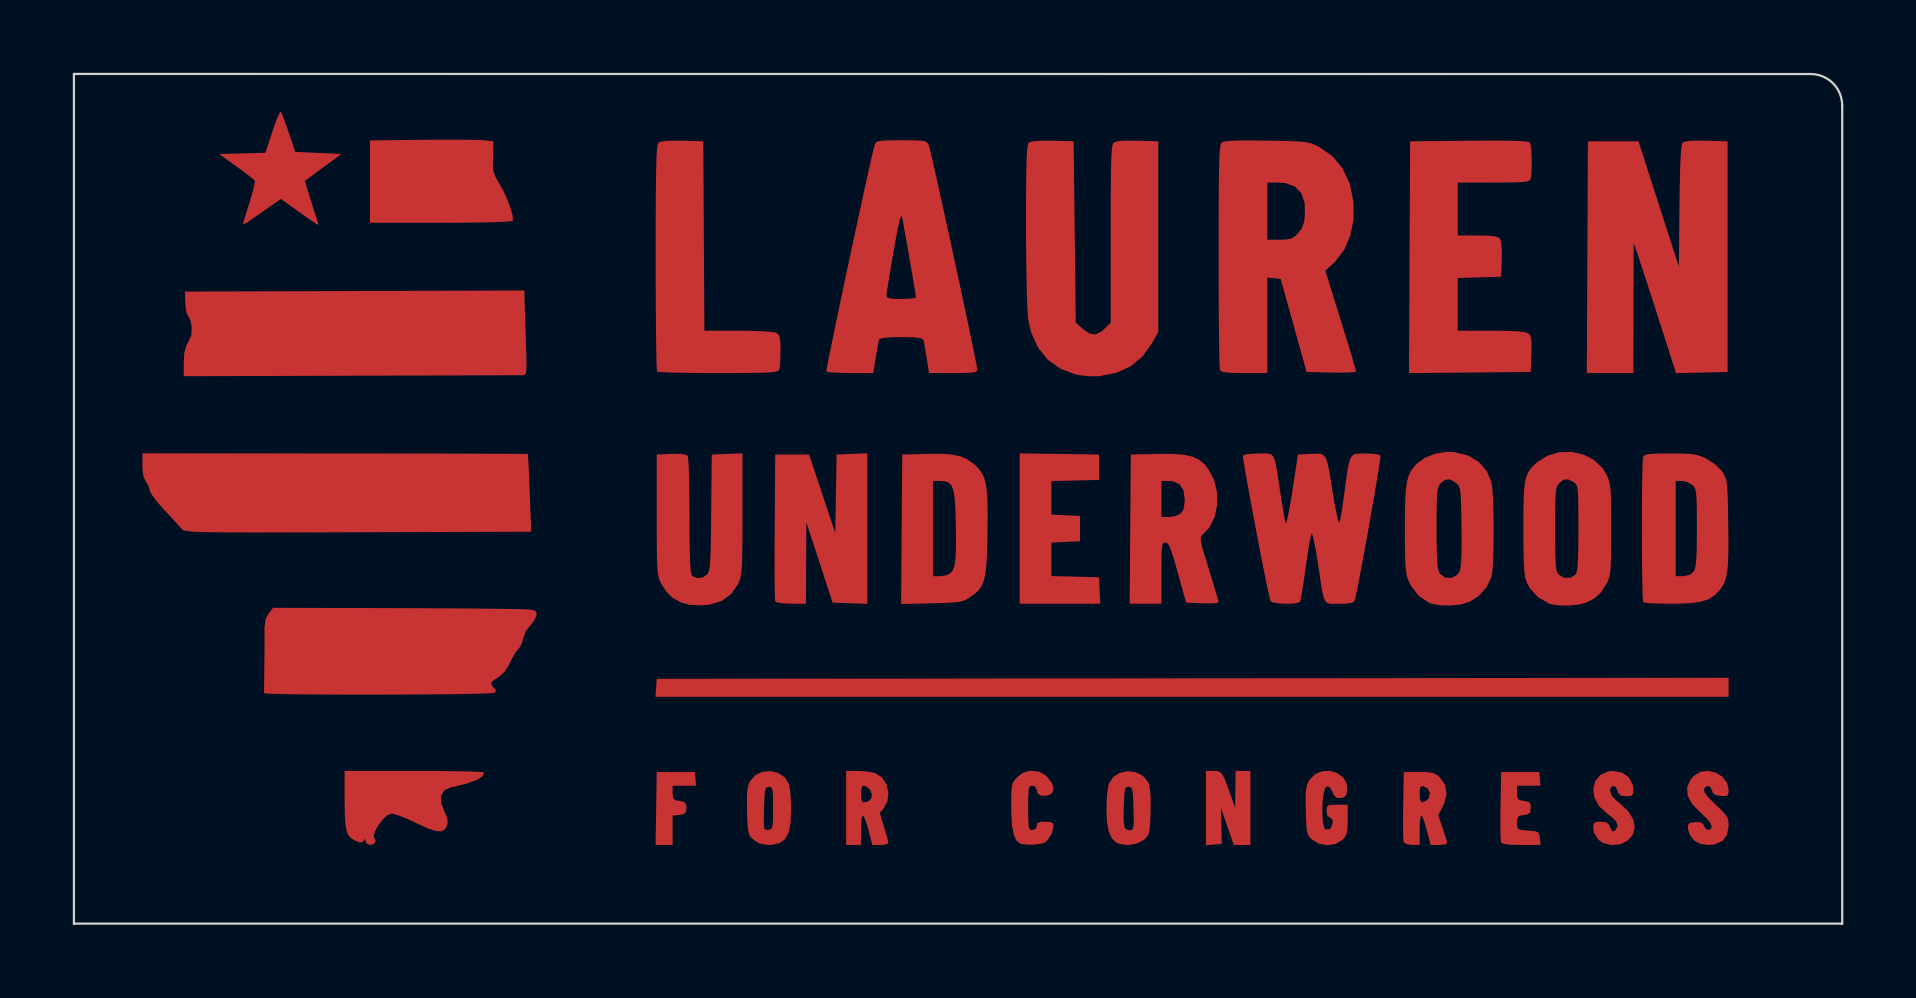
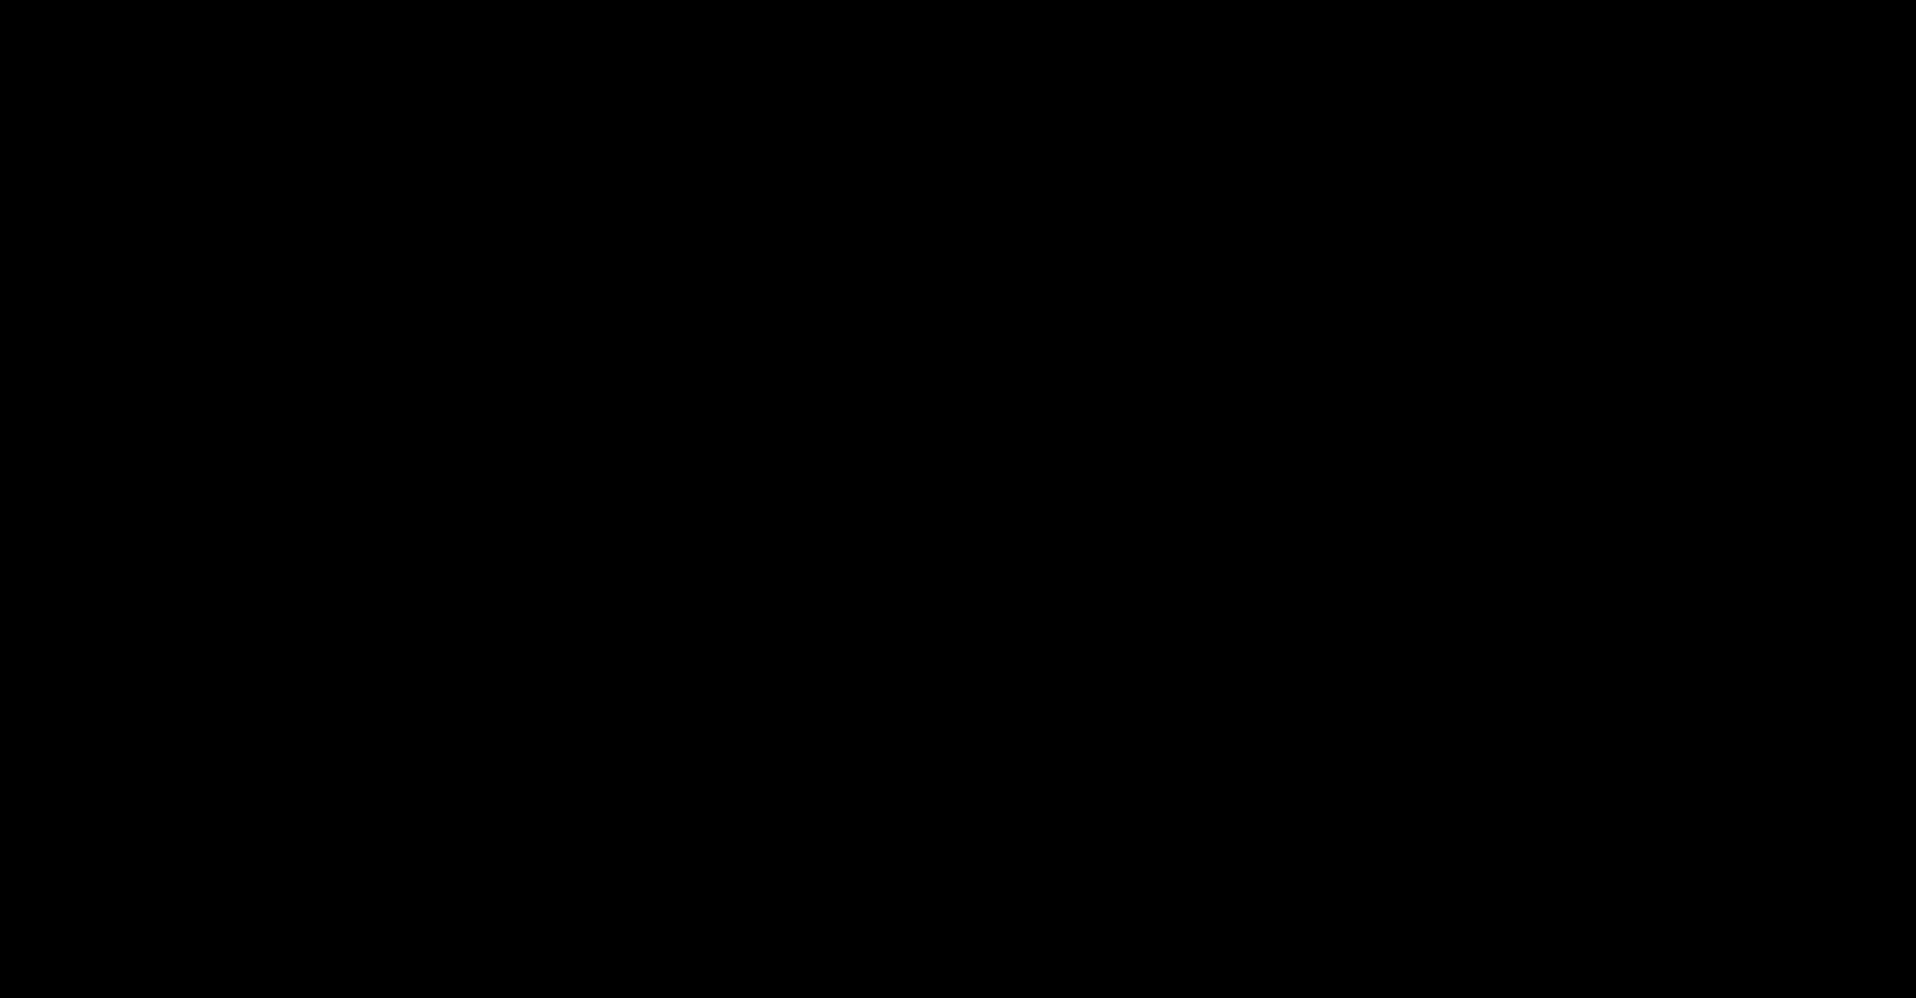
board edge: (73, 73) (1810, 74) (1822, 76) (1835, 86) (1841, 97) (1842, 105) (1842, 923) (73, 923) (73, 73) -> none
drawing: [142, 111, 1729, 846] -> none

